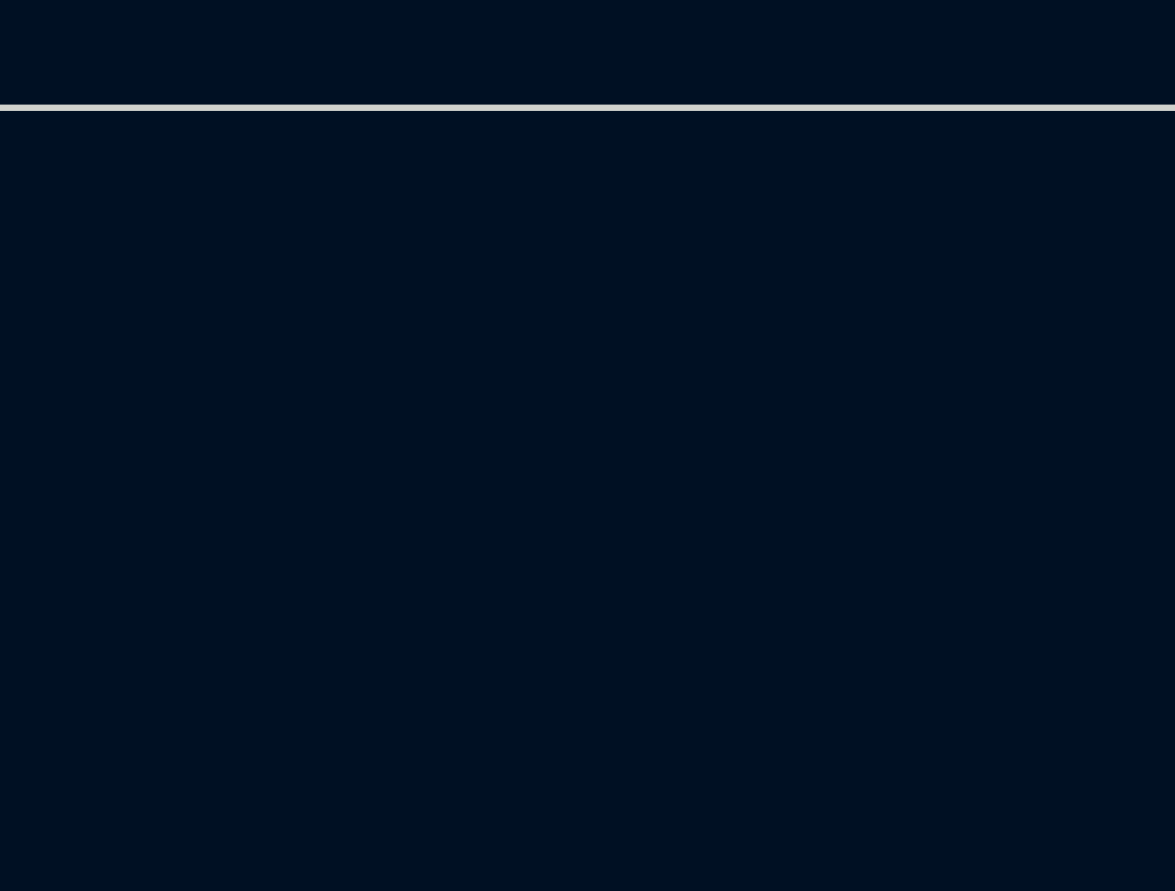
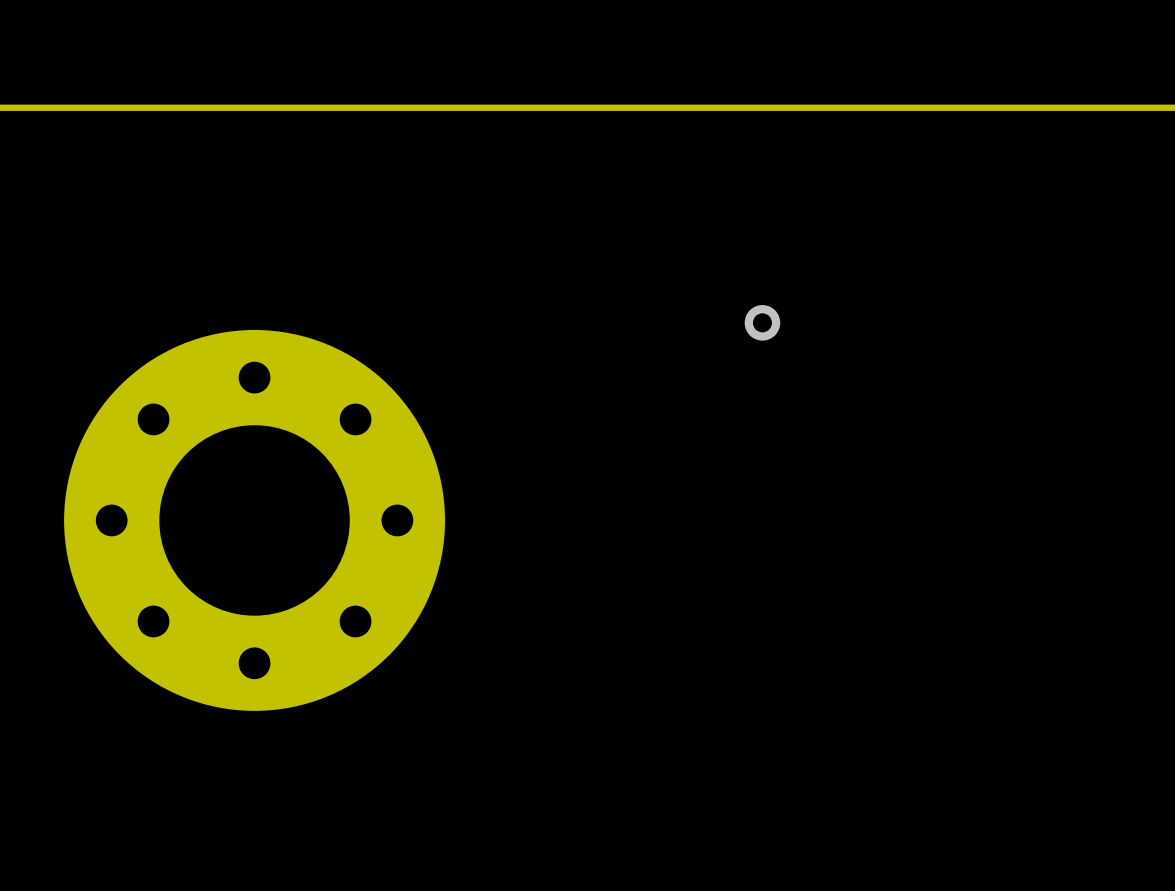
via: none -> (762, 322)
part: none -> (254, 520)

